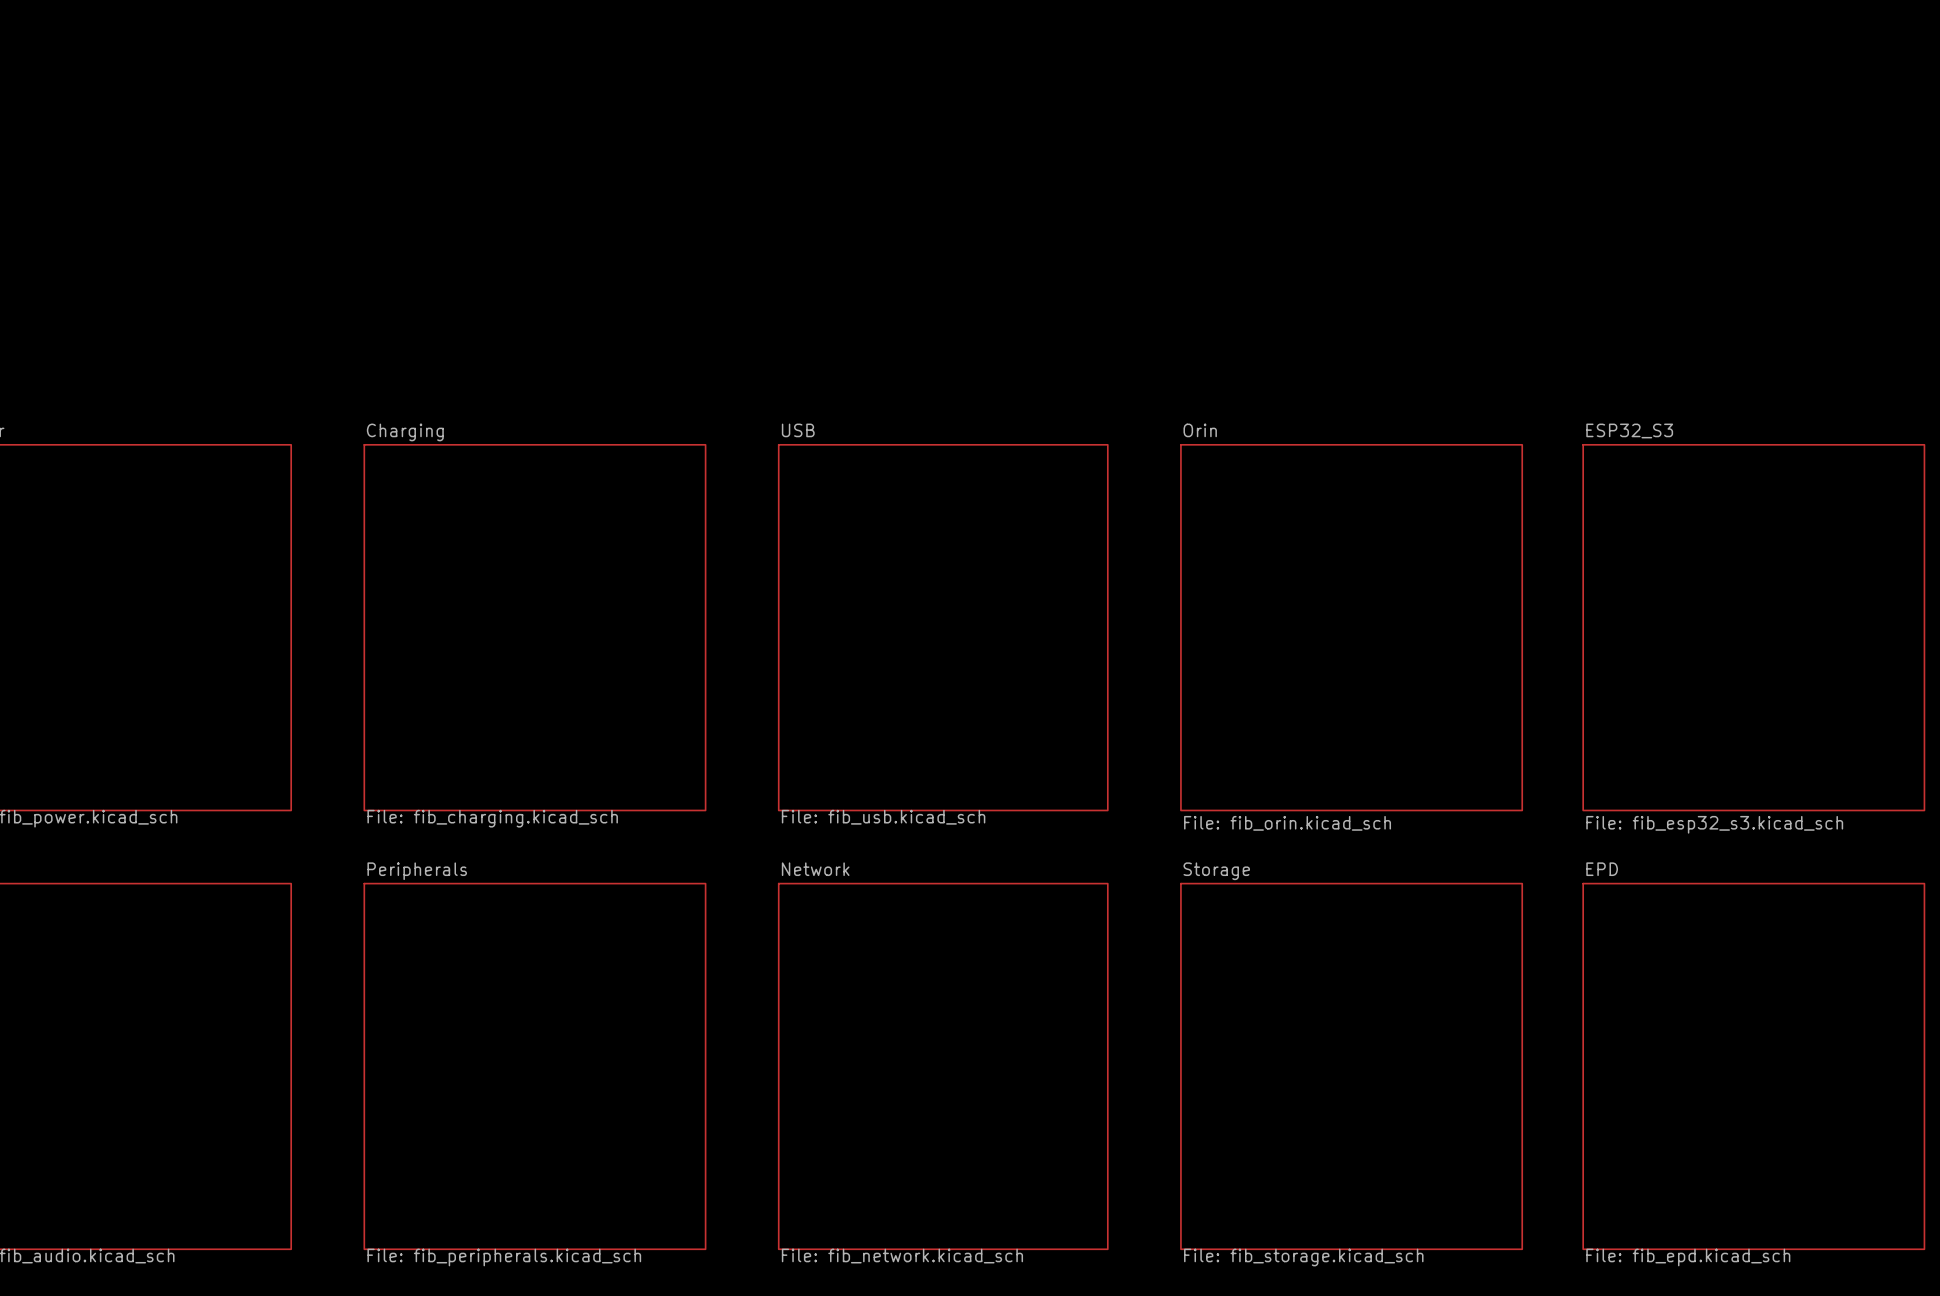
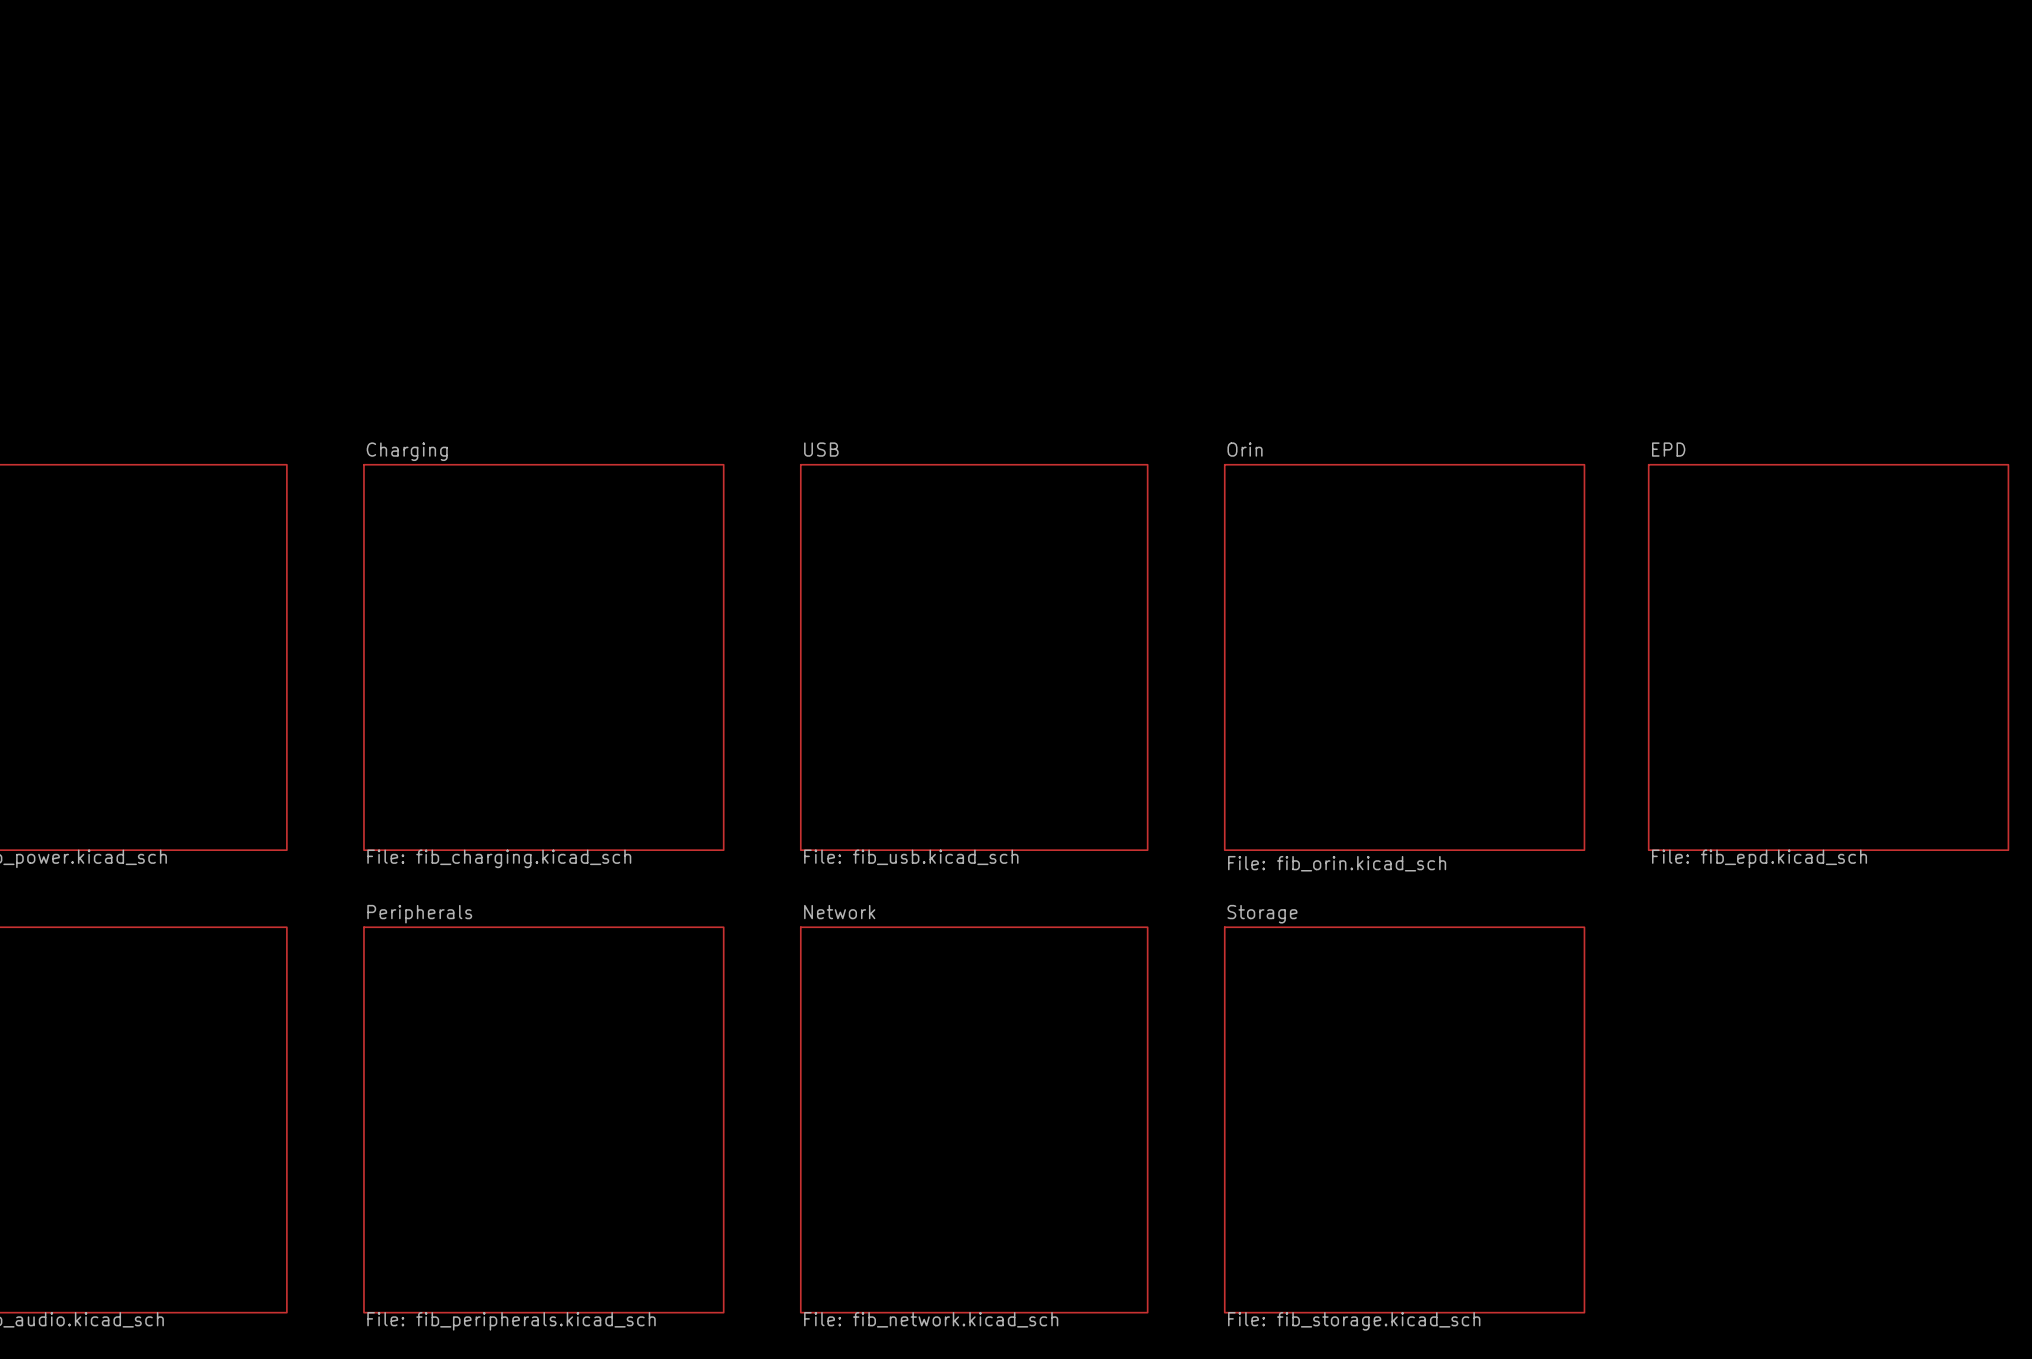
sheet ESP32_S3 name: ESP32_S3 (1629, 430) -> EPD (1668, 449)
sheet ESP32_S3 value: File: fib_esp32_s3.kicad_sch (1714, 824) -> File: fib_epd.kicad_sch (1759, 858)
sheet EPD: File: fib_epd.kicad_sch (1753, 1066) -> none

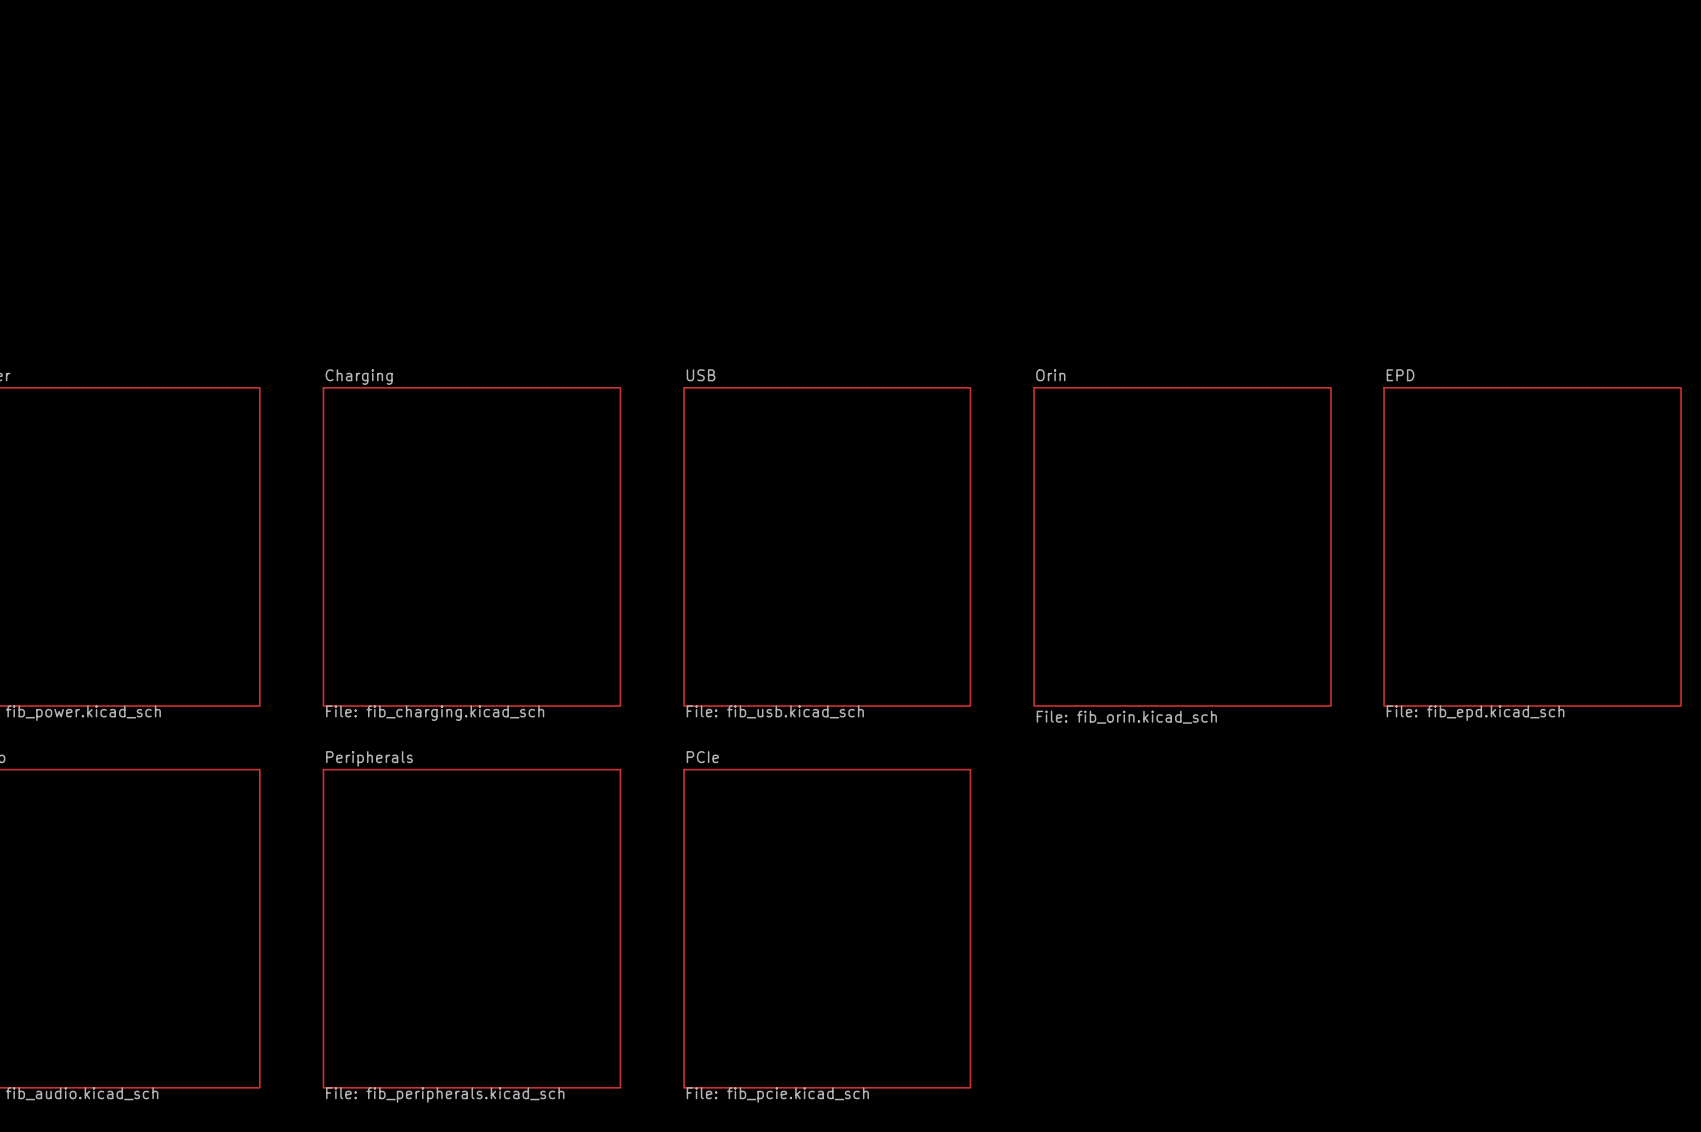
sheet Network name: Network (839, 912) -> PCIe (702, 757)
sheet Storage: File: fib_storage.kicad_sch (1404, 1119) -> none
sheet Network value: File: fib_network.kicad_sch (931, 1319) -> File: fib_pcie.kicad_sch (777, 1094)

